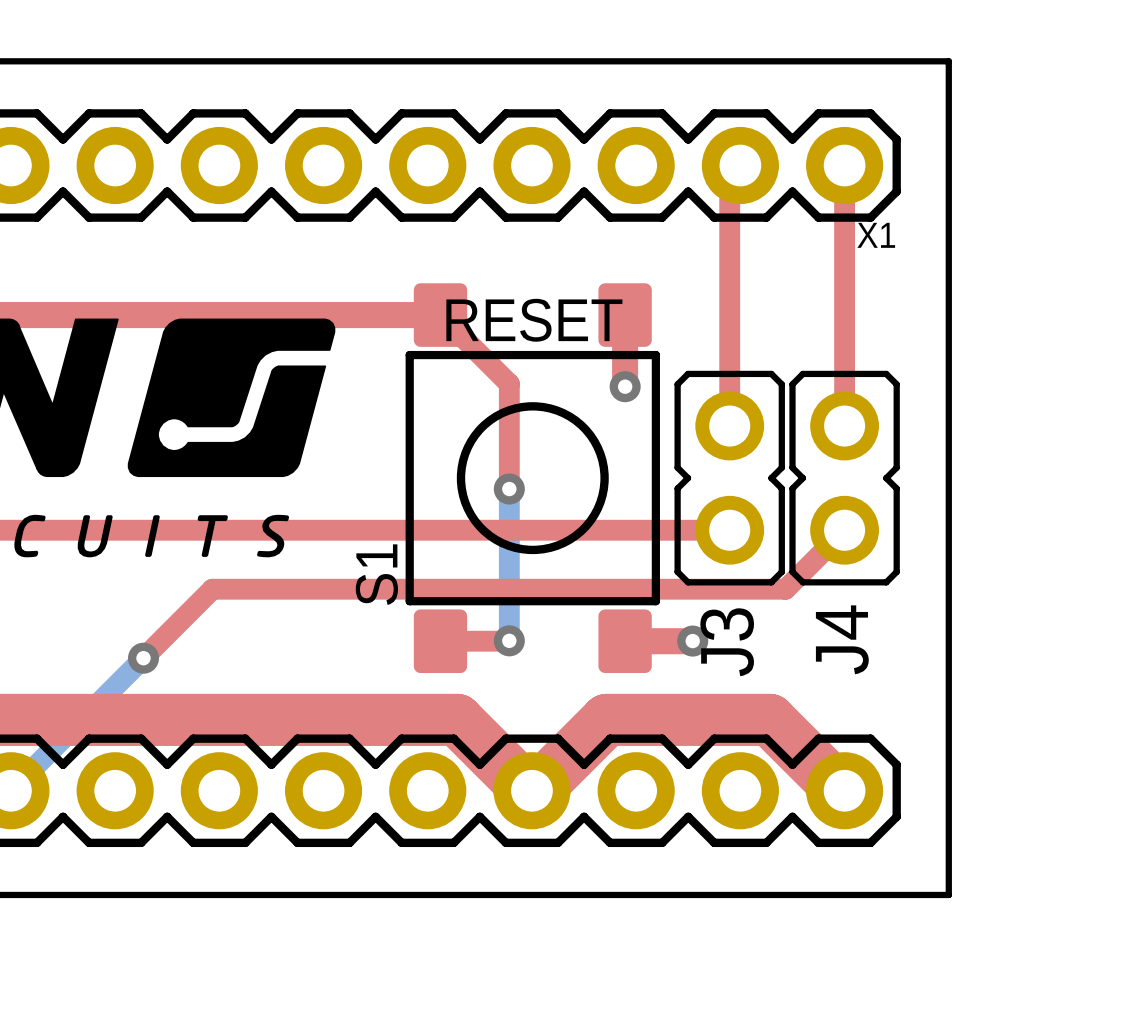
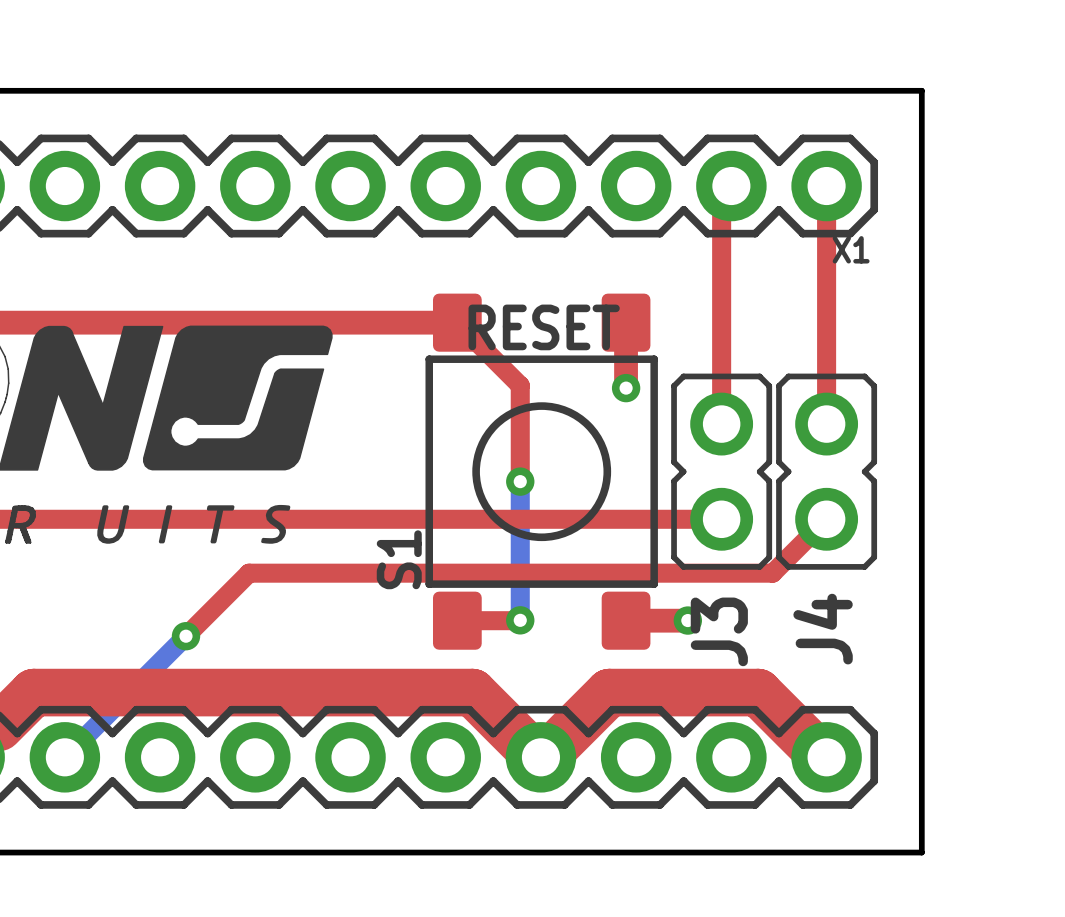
drawing shape: [127, 318, 336, 478] -> [143, 325, 333, 471]
drawing: [14, 514, 46, 558] -> none
drawing: none -> [158, 504, 291, 544]
drawing: [145, 514, 290, 558] -> none
drawing shape: [77, 515, 113, 558] -> [97, 505, 130, 544]

